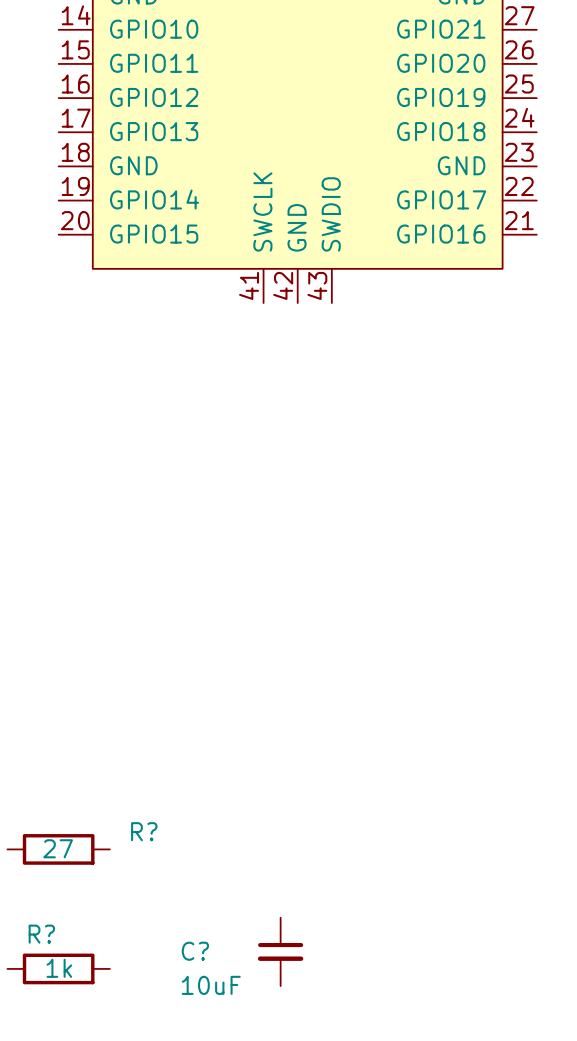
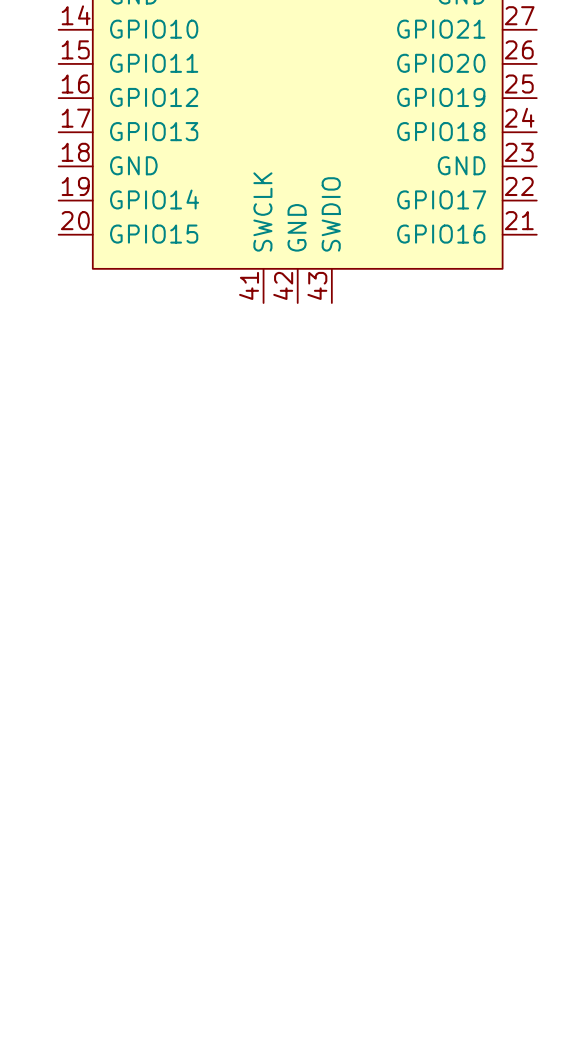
R?: 27 (58, 849) -> none
C?: 10uF (280, 951) -> none
R?: 1k (58, 968) -> none

